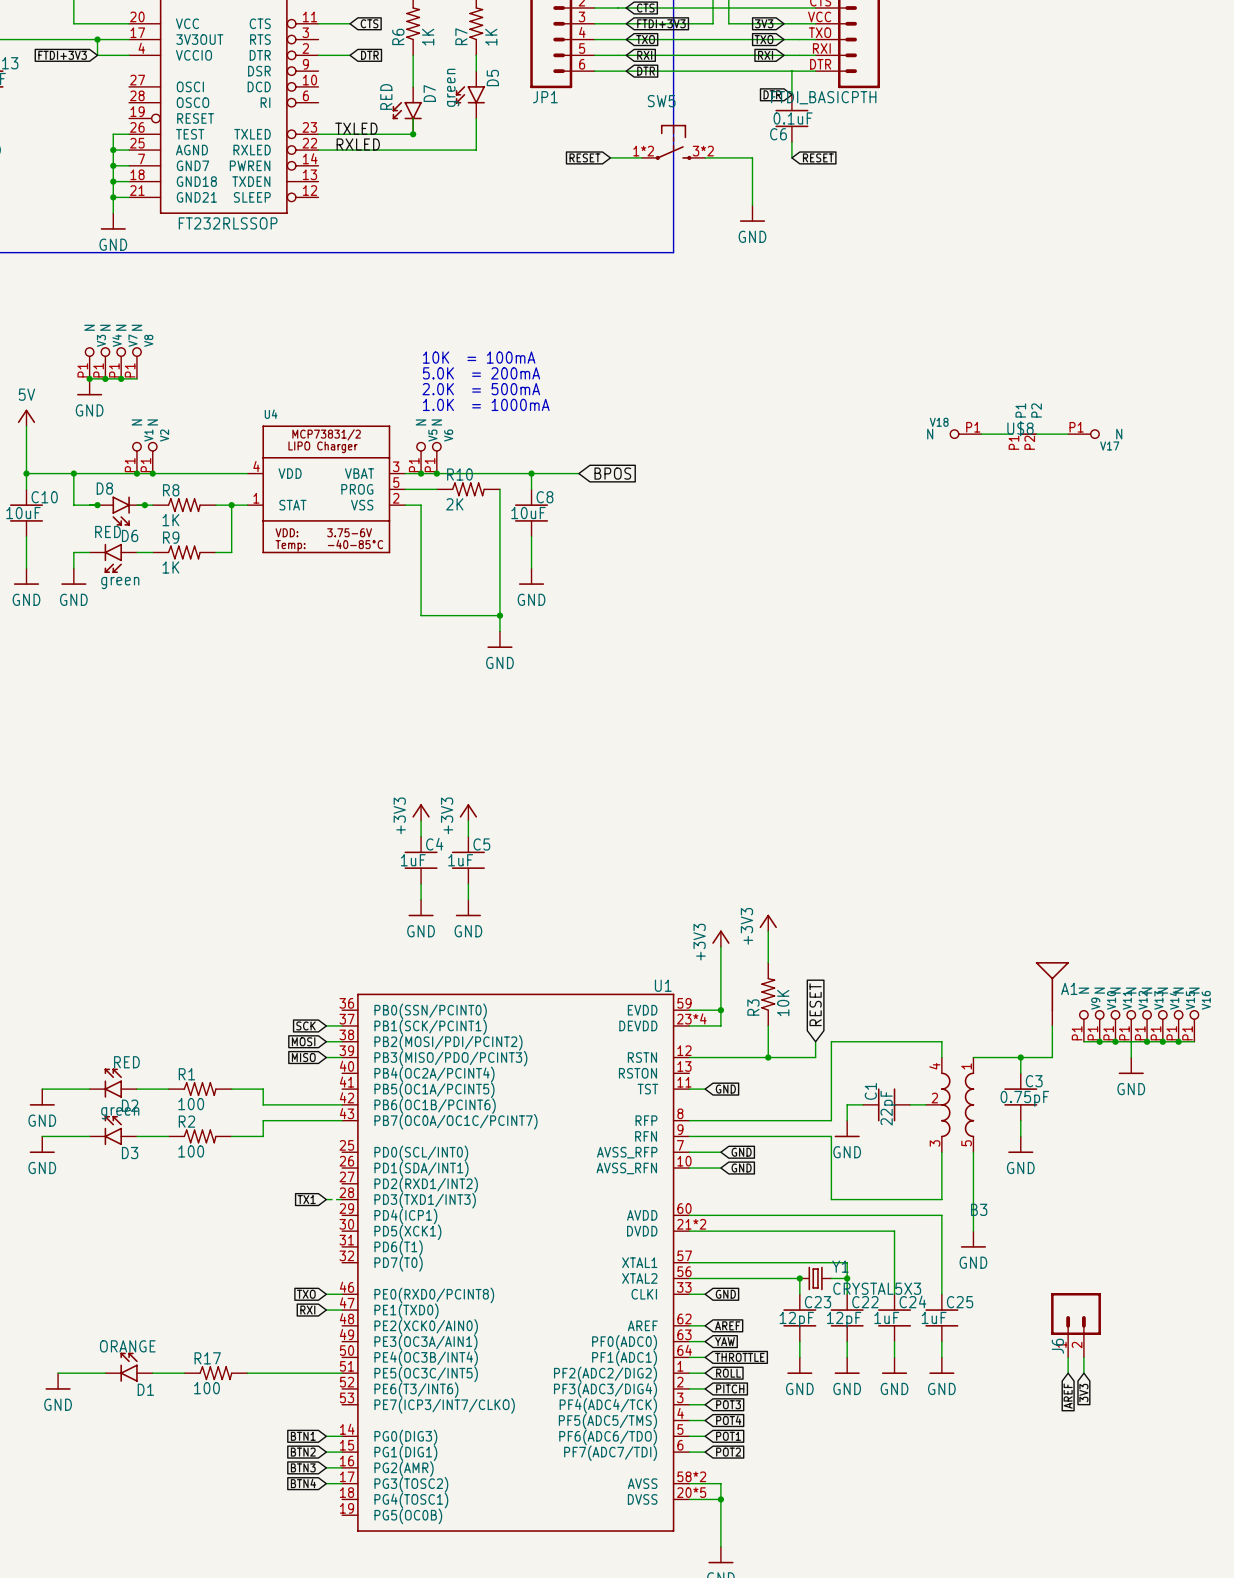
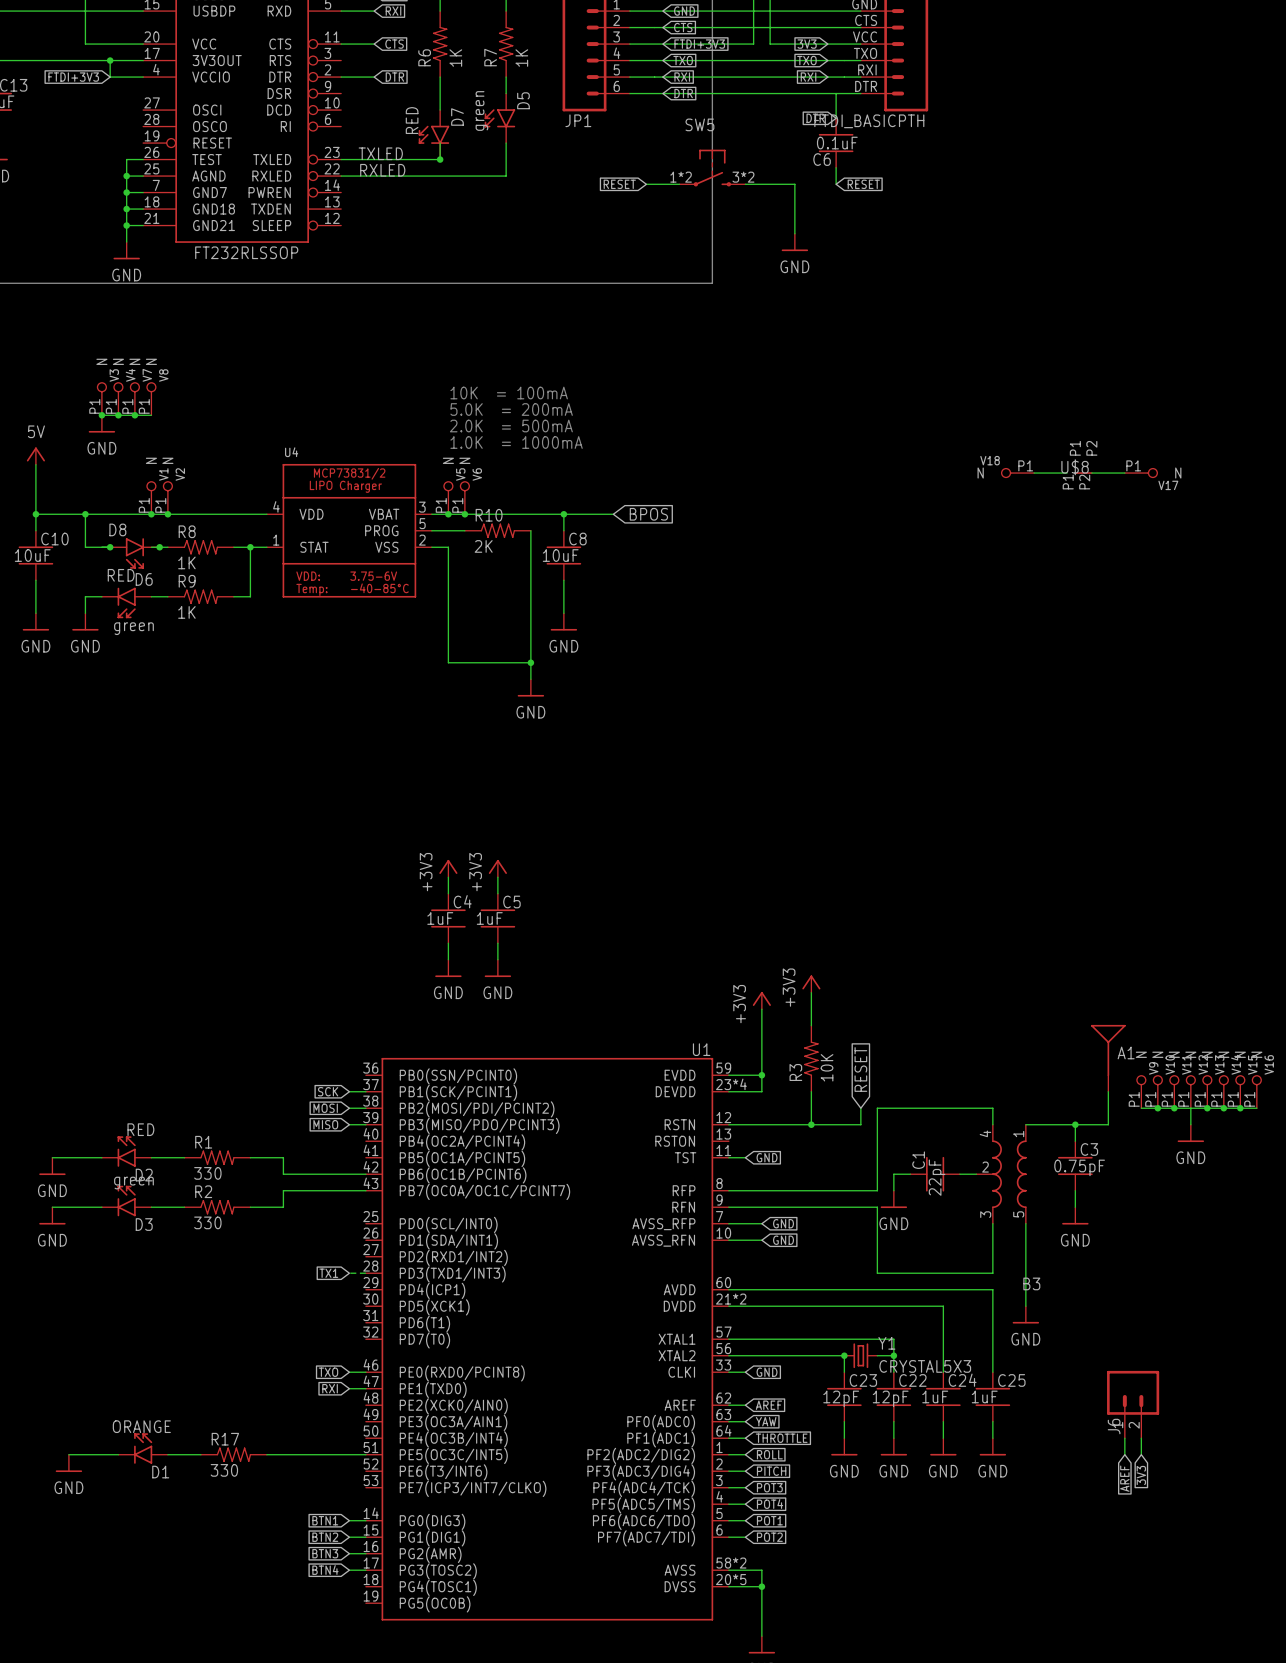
R1 value: 100 (191, 1104) -> 330 (207, 1173)
R2 value: 100 (191, 1151) -> 330 (207, 1222)
R17 value: 100 (206, 1388) -> 330 (224, 1470)

